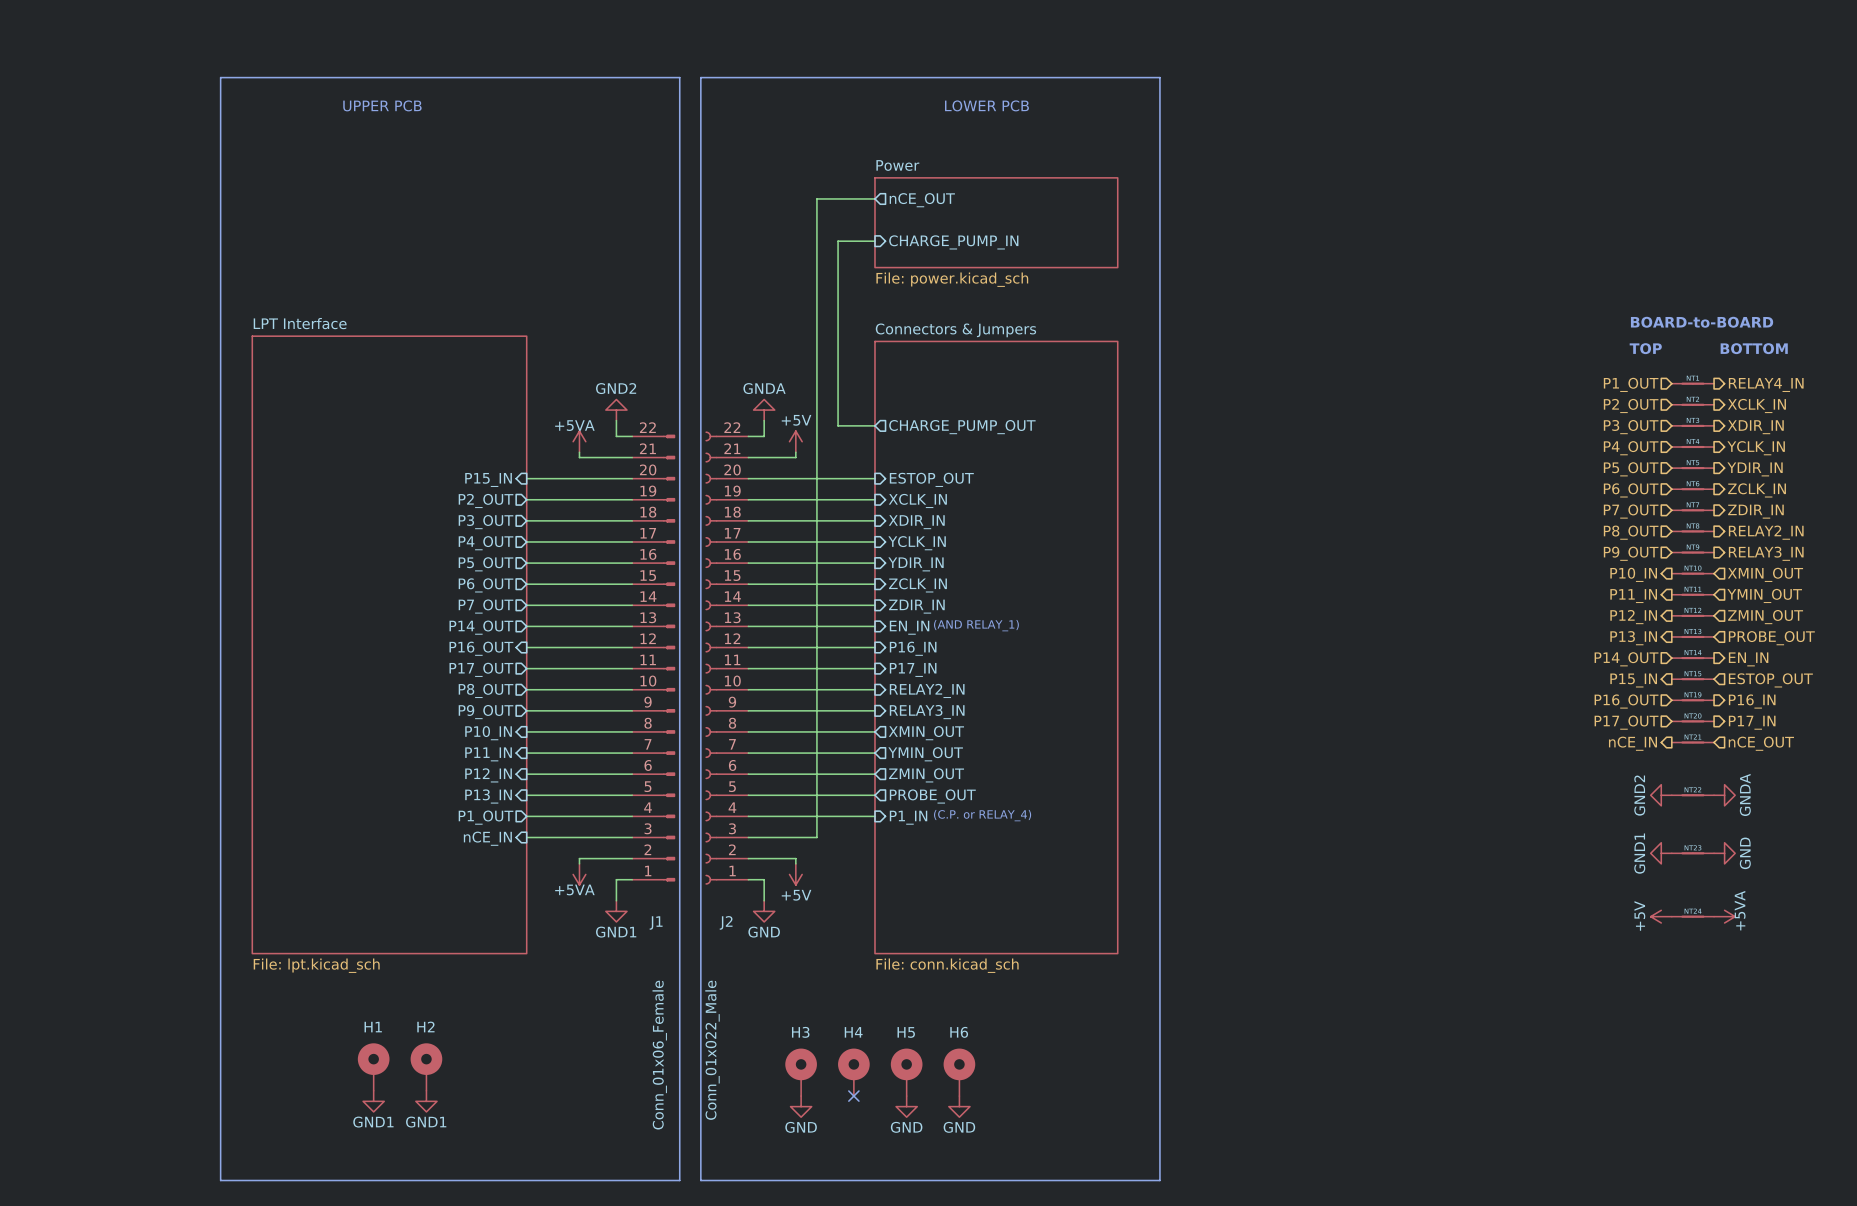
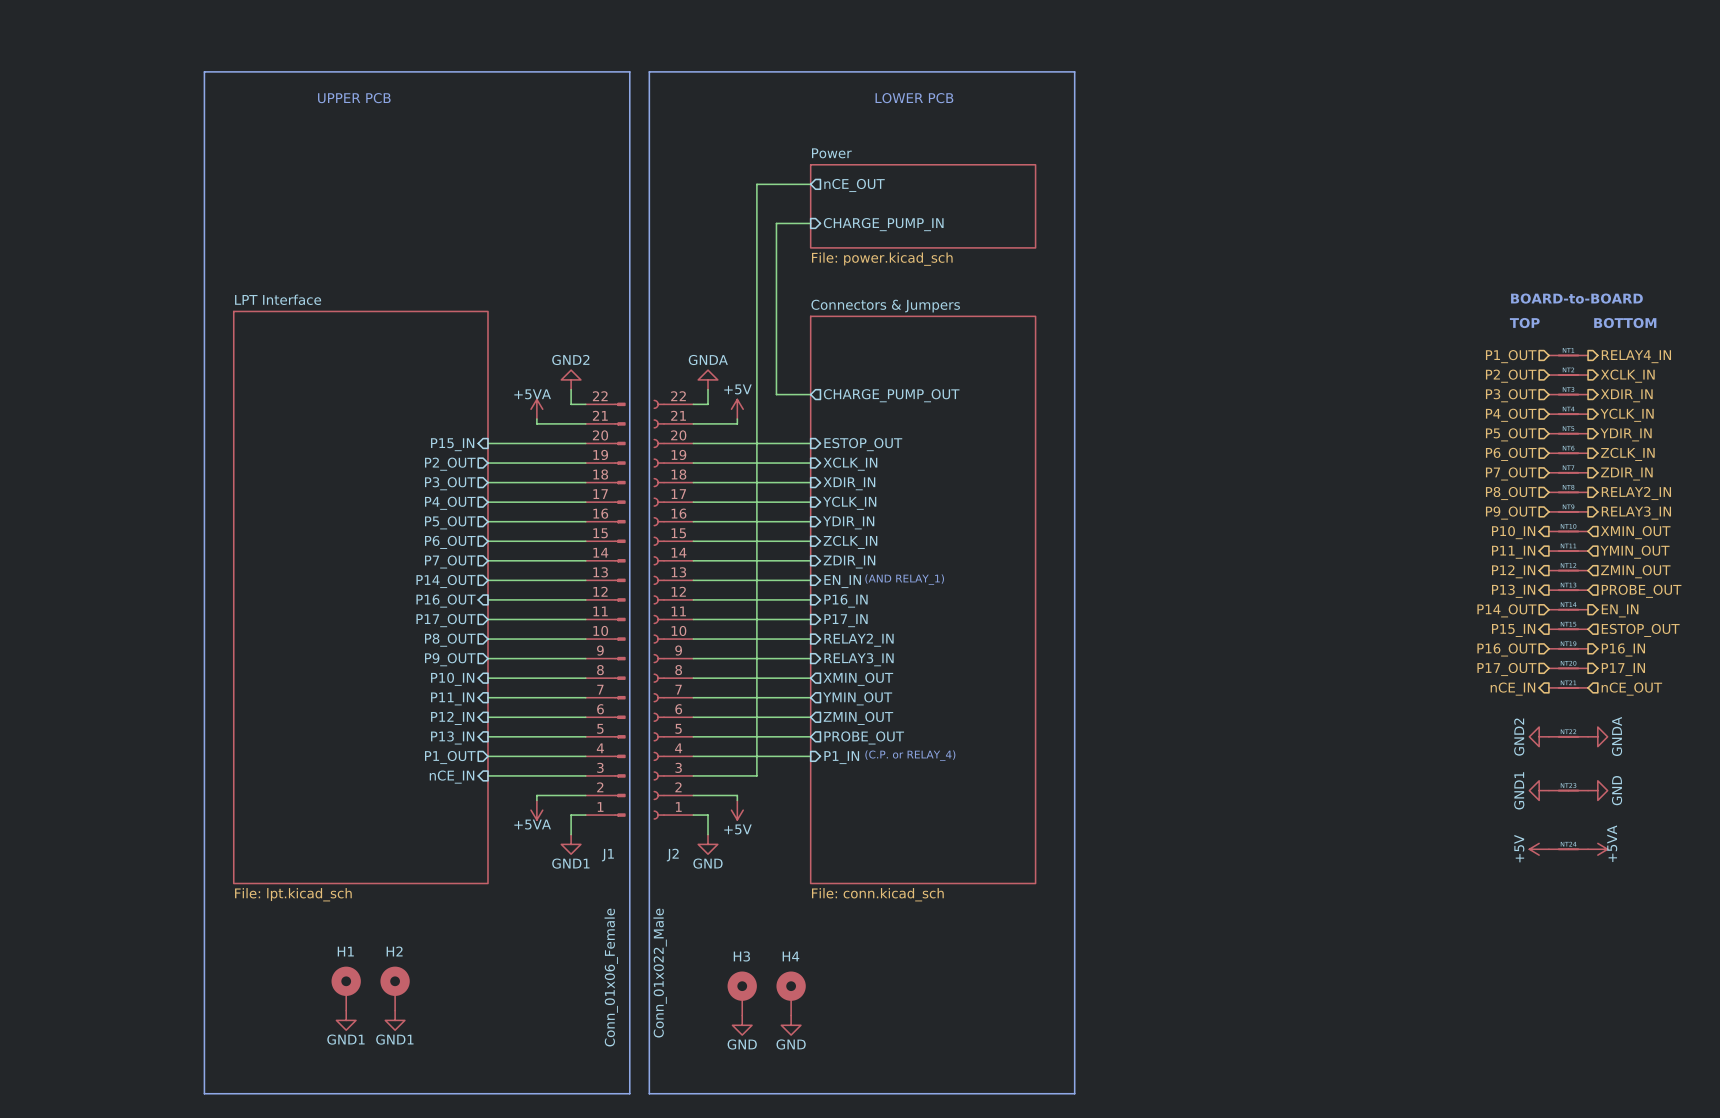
H5: (906, 1072) -> none
H6: (959, 1072) -> none
no-connect mark: (853, 1096) -> none
power symbol: none -> GND (791, 1025)
power symbol: GND (906, 1106) -> none
power symbol: GND (959, 1106) -> none

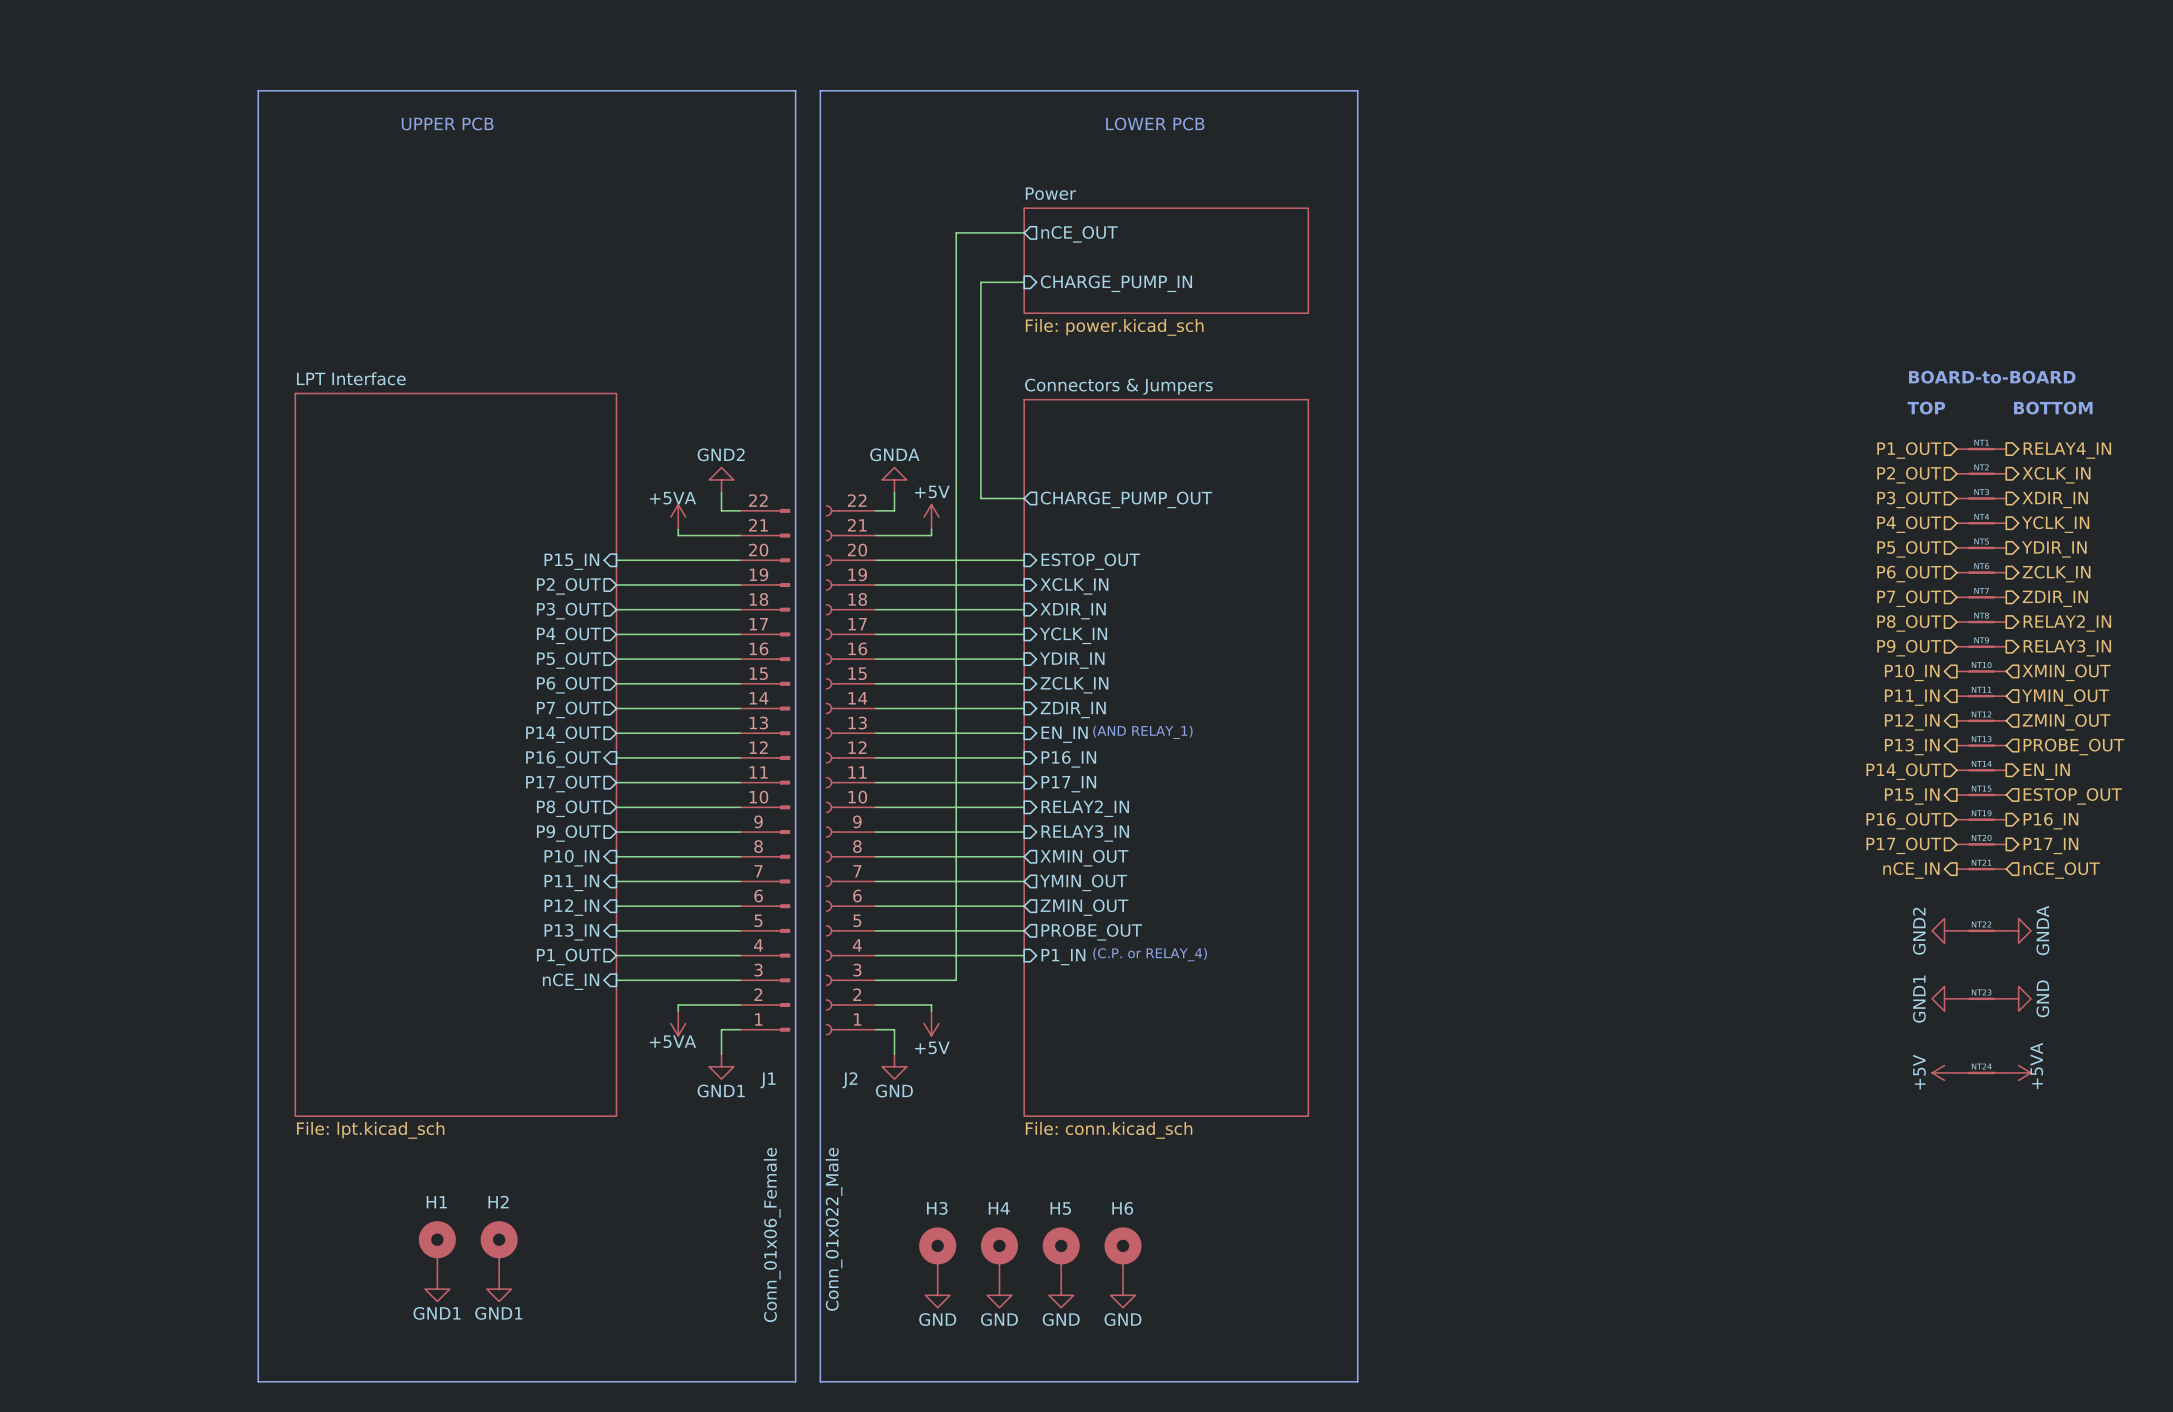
H5: none -> (1061, 1255)
H6: none -> (1123, 1255)
power symbol: none -> GND (1061, 1295)
power symbol: none -> GND (1123, 1295)

